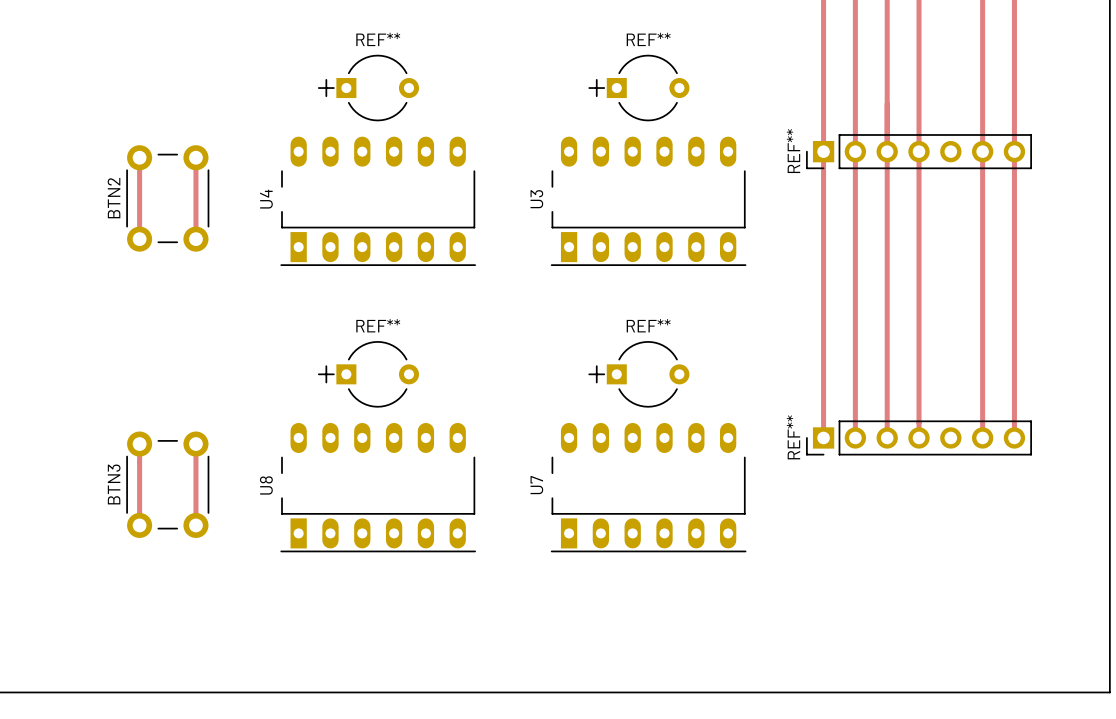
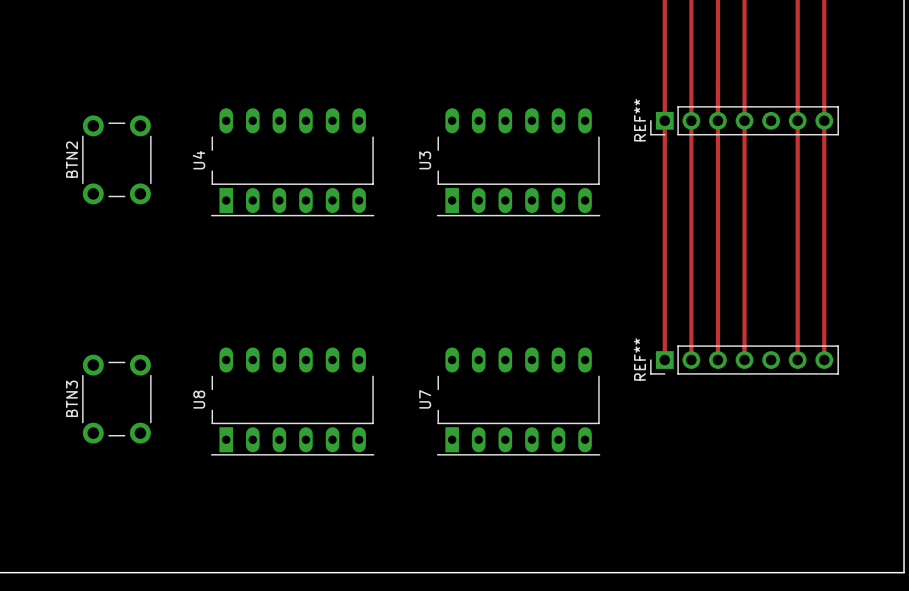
REF**: (368, 88) -> none
REF**: (638, 88) -> none
track: (139, 157) (139, 239) -> none
track: (195, 157) (195, 239) -> none
REF**: (368, 374) -> none
REF**: (638, 374) -> none
track: (139, 444) (139, 525) -> none
track: (195, 444) (195, 525) -> none

